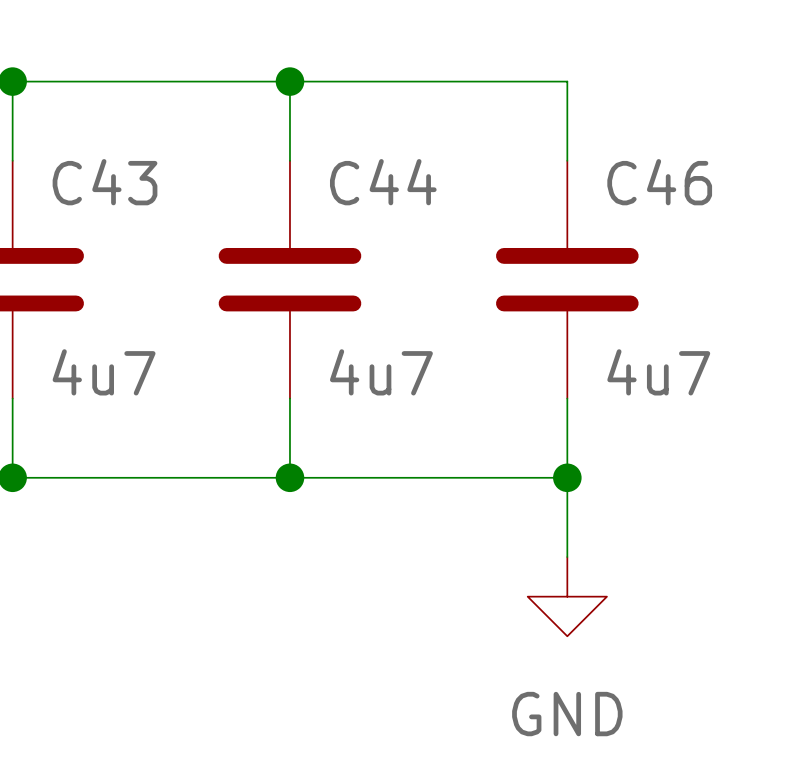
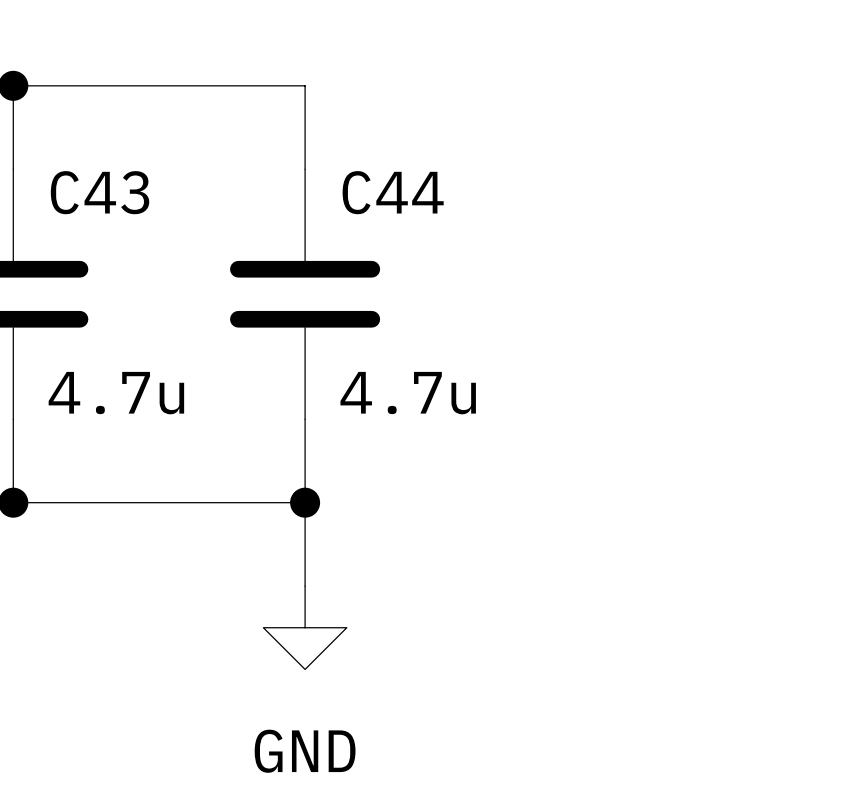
wire: (289, 81) (567, 81) (567, 160) -> none
junction: (289, 81) -> none
C46: 4u7 (567, 279) -> none
C43 value: 4u7 (104, 372) -> 4.7u (116, 393)
C44 value: 4u7 (381, 372) -> 4.7u (408, 393)
wire: (567, 398) (567, 557) -> none
wire: (289, 477) (567, 477) -> (305, 502) (305, 586)
junction: (567, 477) -> none
power symbol position: GND (567, 596) -> GND (305, 627)

